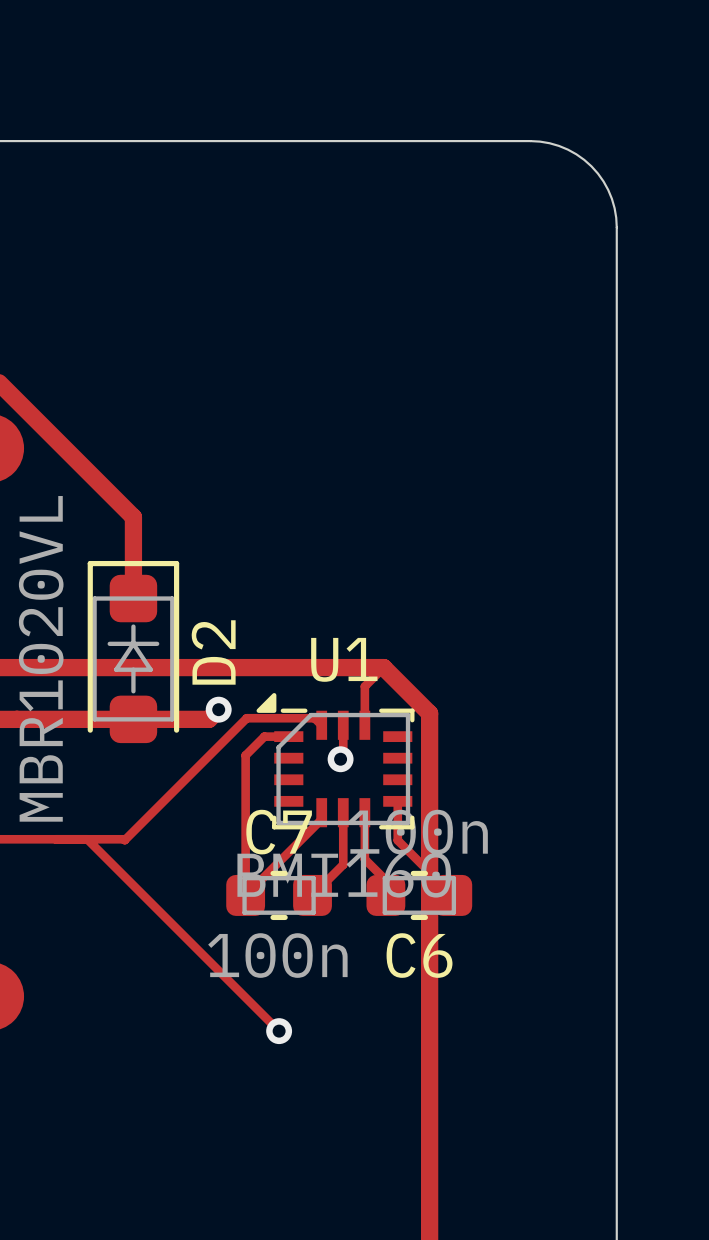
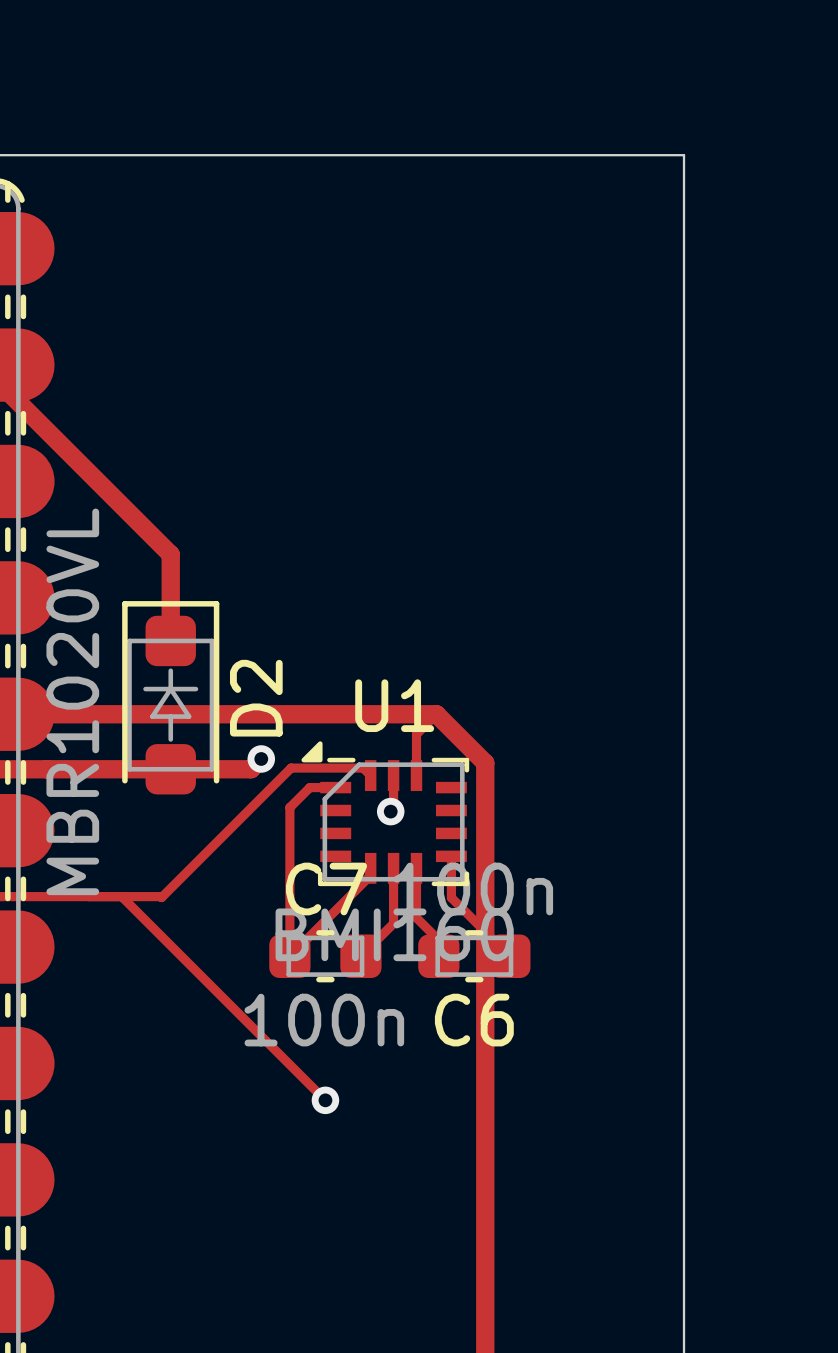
board edge: (530, 141) (558, 145) (576, 154) (591, 166) (603, 181) (611, 198) (616, 227) -> (592, 155) (684, 155) (684, 246)

